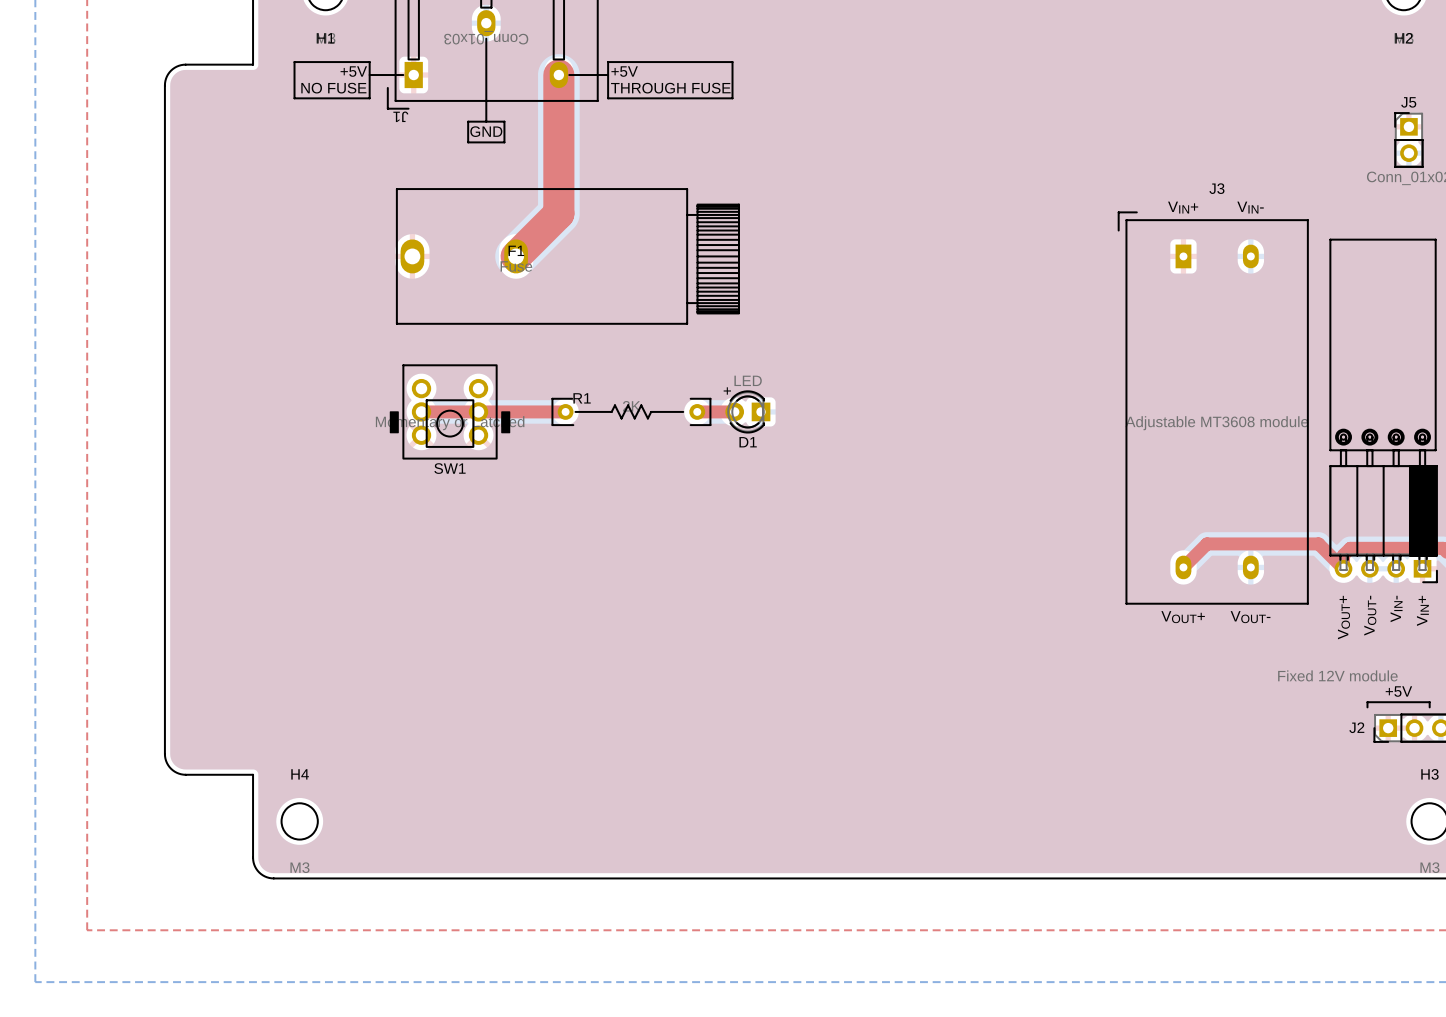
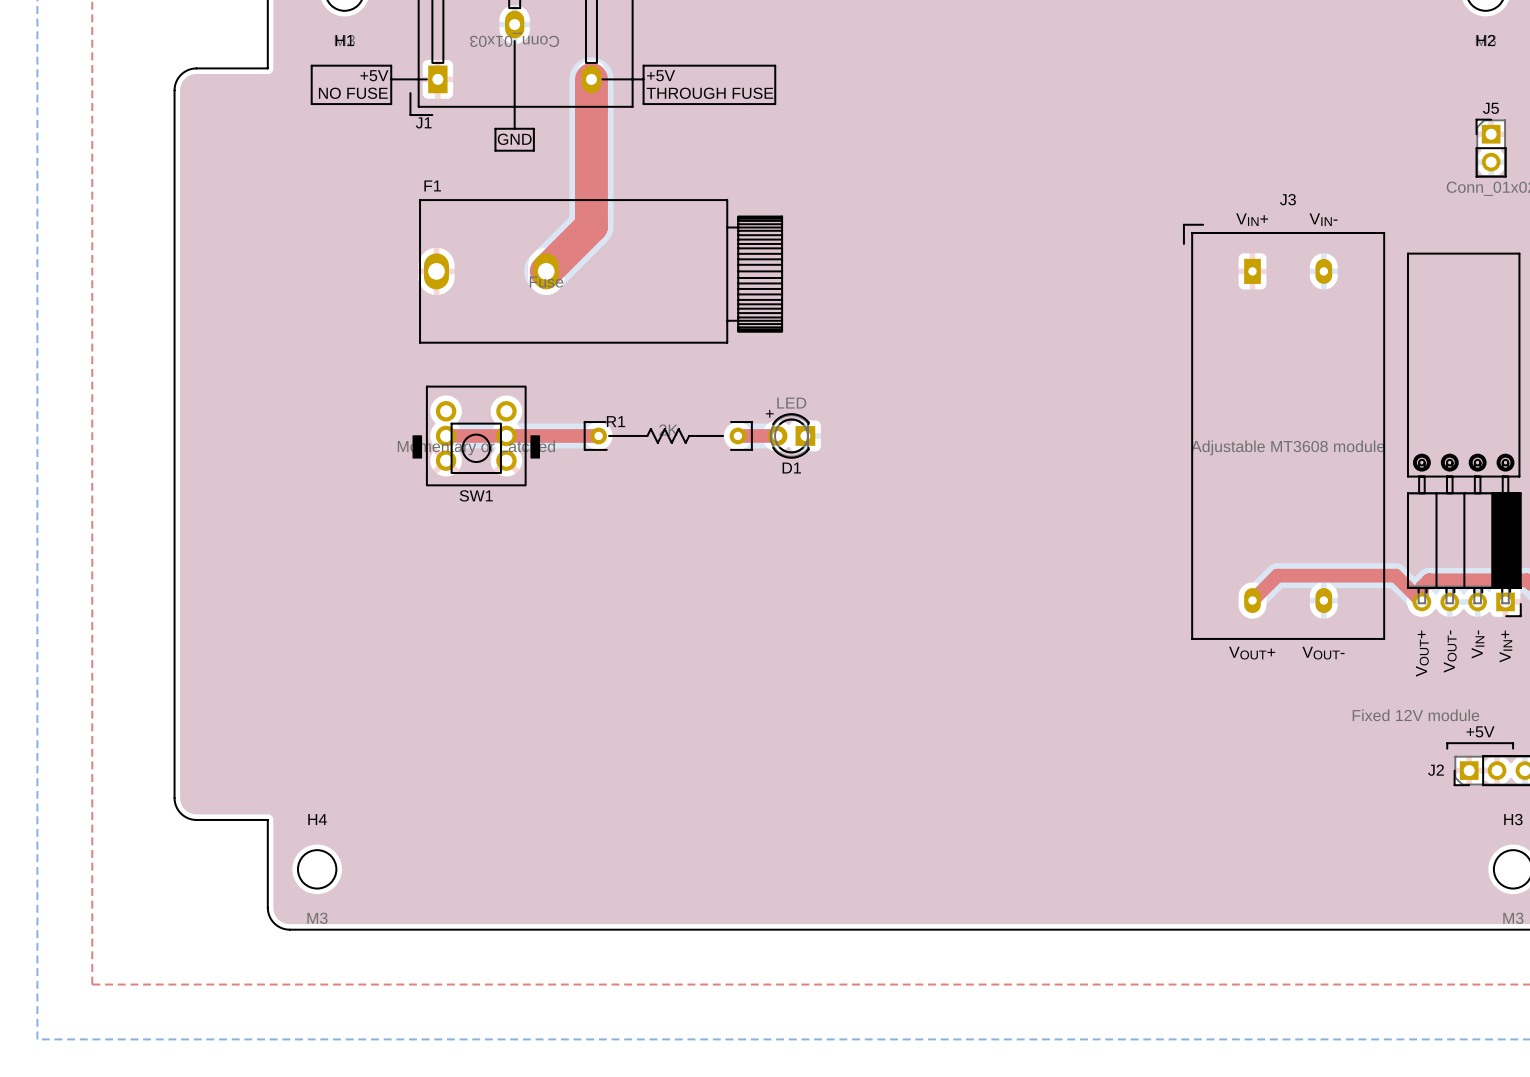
J1 name rotation: 0° (400, 116) -> 180° (423, 122)
F1 name position: F1 (516, 250) -> F1 (432, 185)

